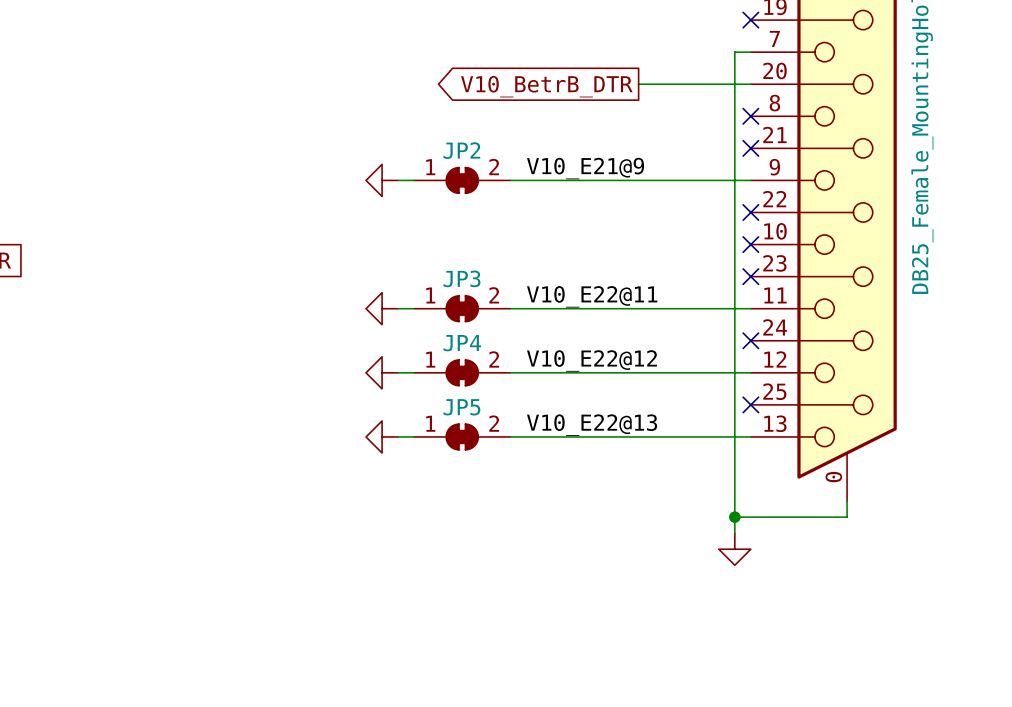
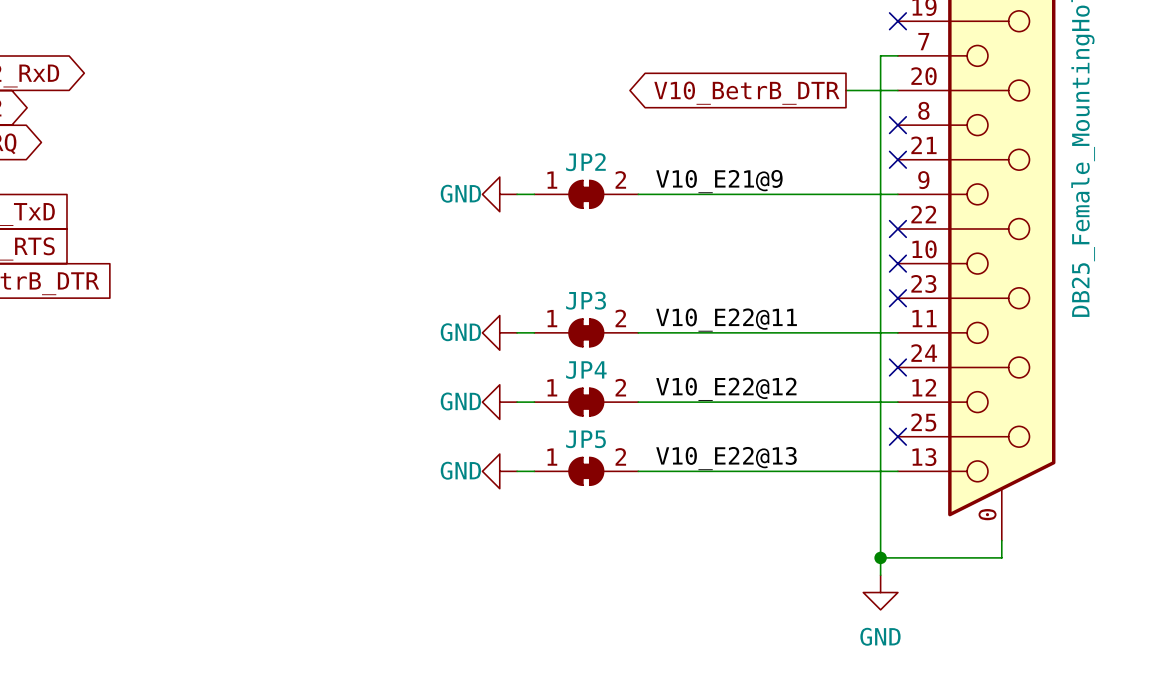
wire: (638, 84) (702, 84) -> none
global label position: V10_BetrB_DTR (546, 86) -> V10_BetrB_DTR (746, 93)
power symbol text: none -> GND (460, 193)
power symbol text: none -> GND (460, 332)
power symbol text: none -> GND (460, 401)
power symbol text: none -> GND (460, 470)
power symbol text: none -> GND (880, 636)

